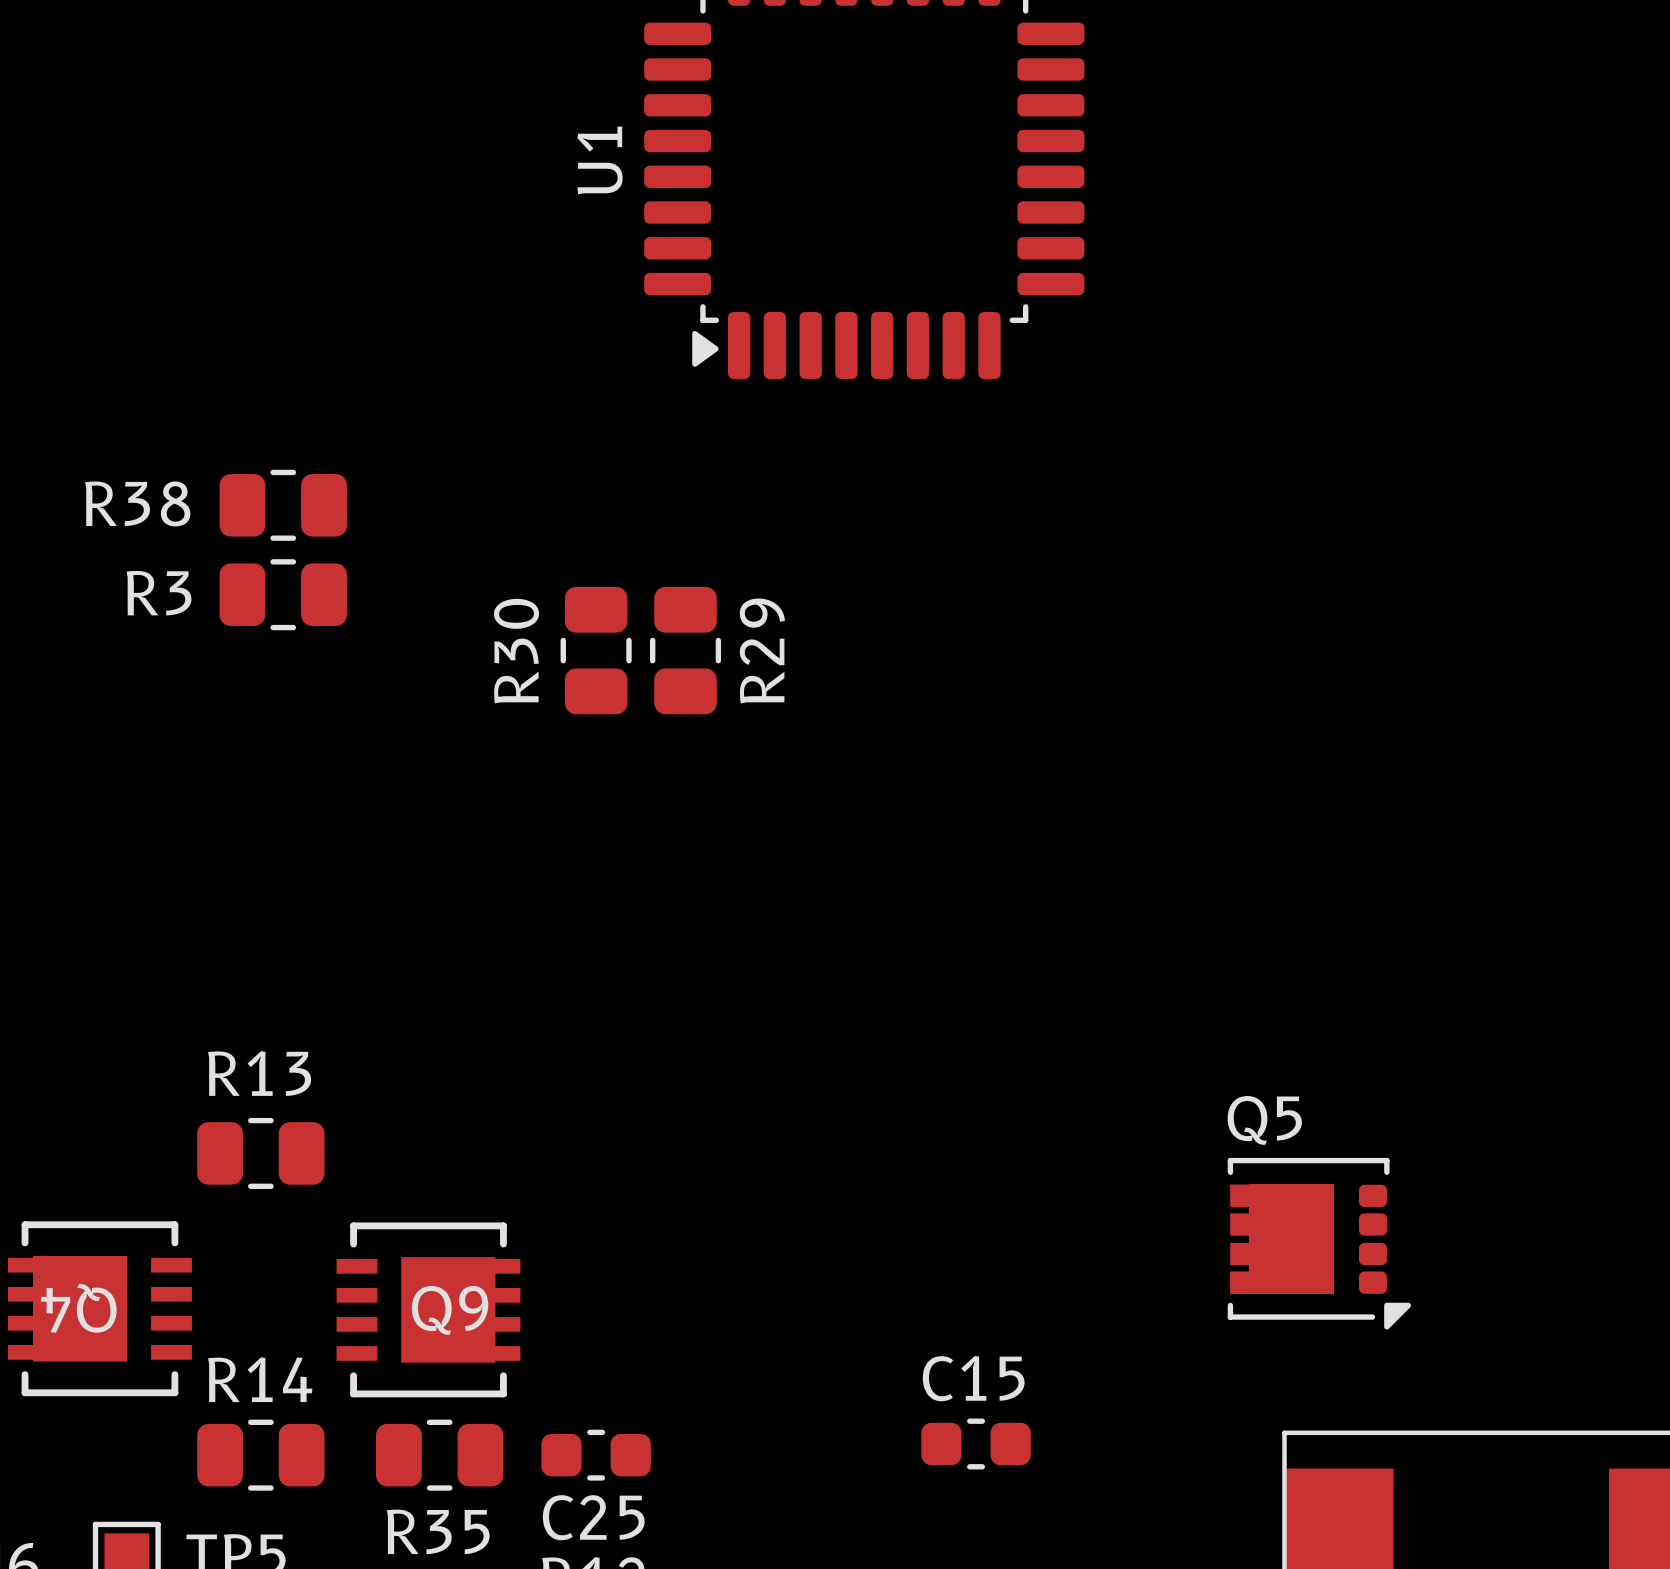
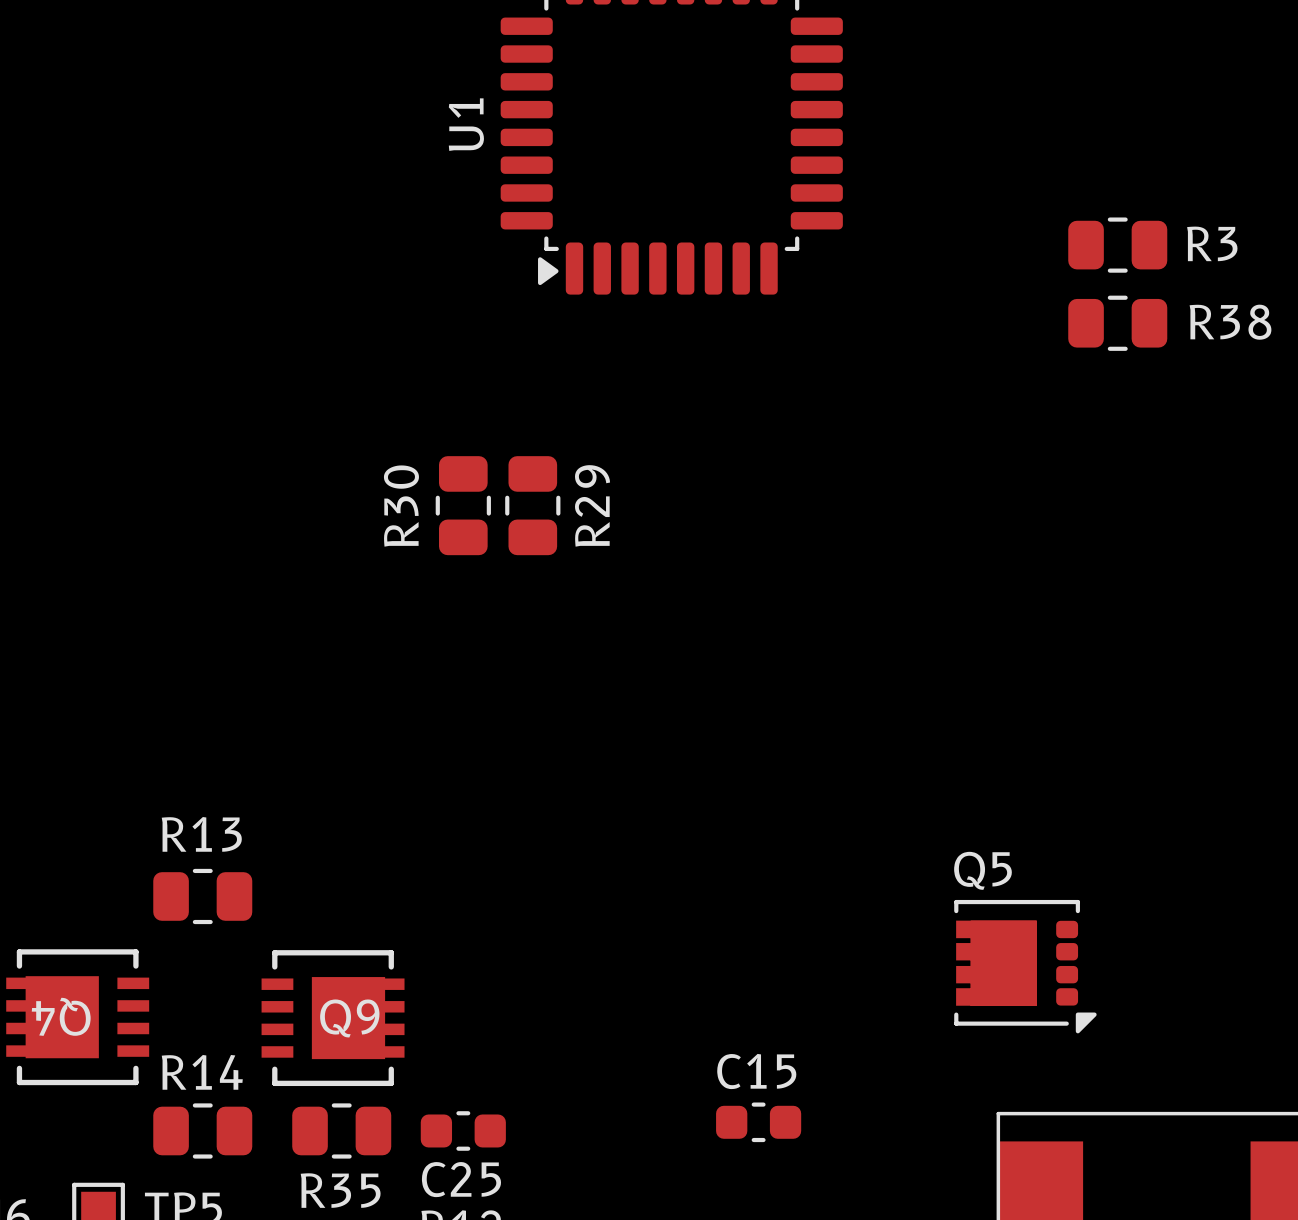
R38 name position: R38 (137, 503) -> R38 (1230, 322)
R38 position: (283, 505) -> (1117, 323)
R3 name position: R3 (159, 593) -> R3 (1212, 243)
R3 position: (283, 594) -> (1117, 245)

